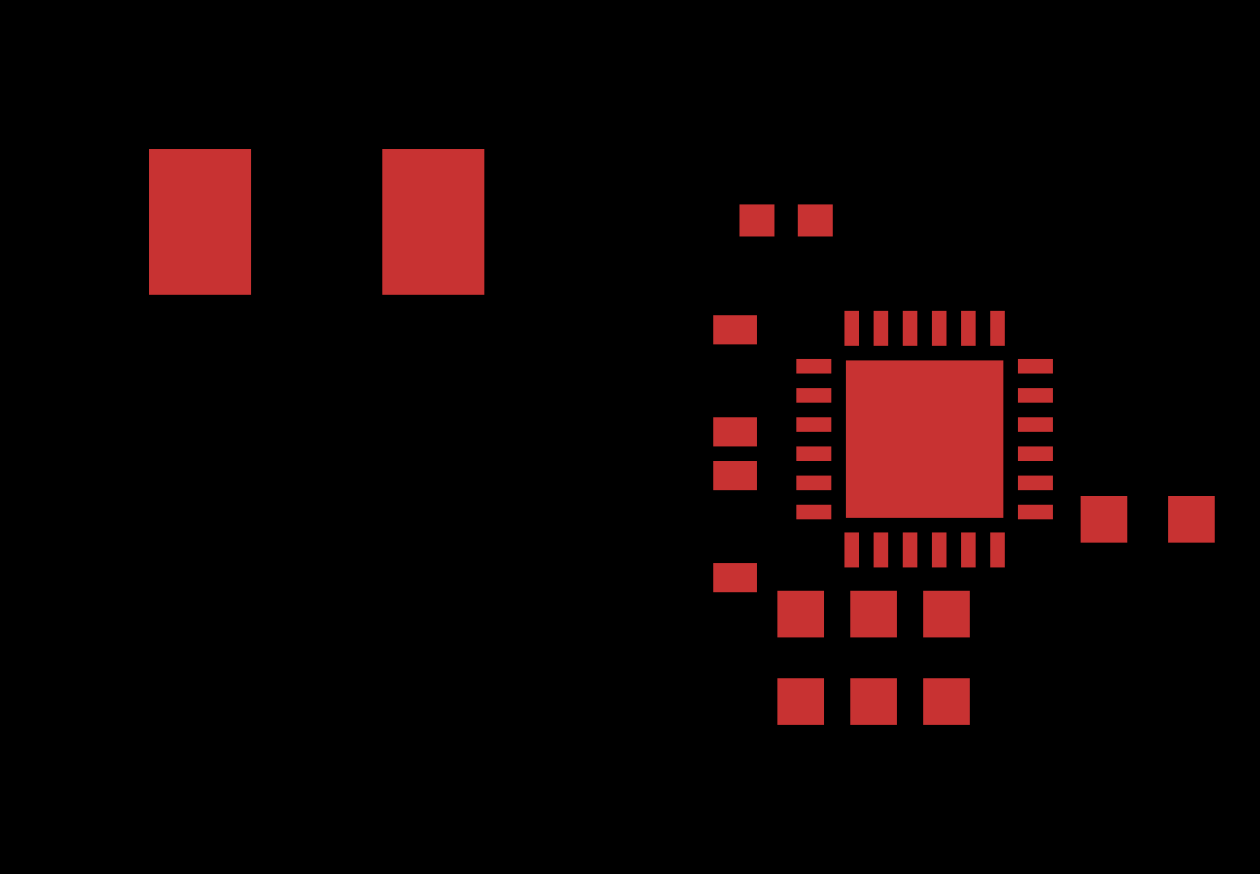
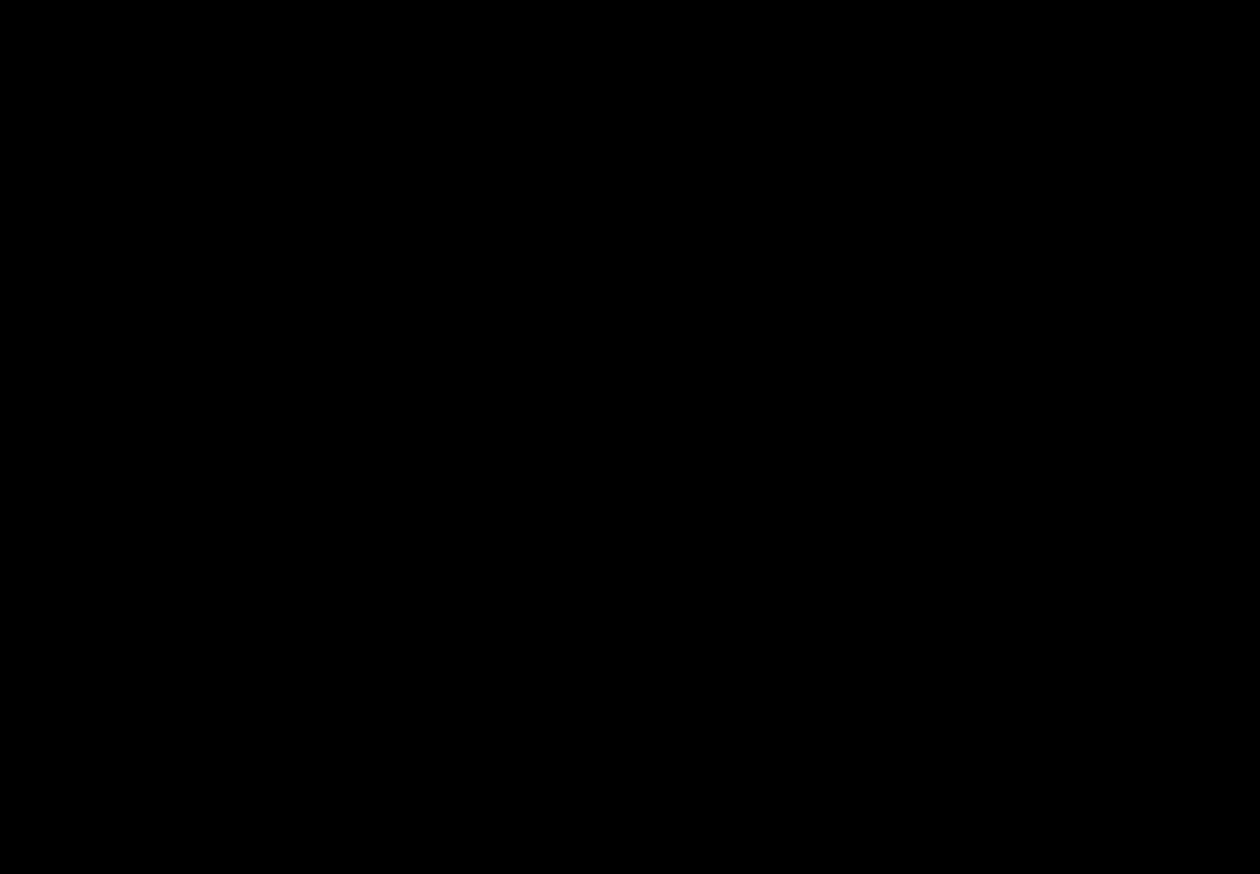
part: (786, 220) -> none
part: (316, 221) -> none
part: (735, 380) -> none
part: (924, 439) -> none
part: (1147, 519) -> none
part: (735, 526) -> none
part: (800, 657) -> none
part: (873, 657) -> none
part: (946, 657) -> none

